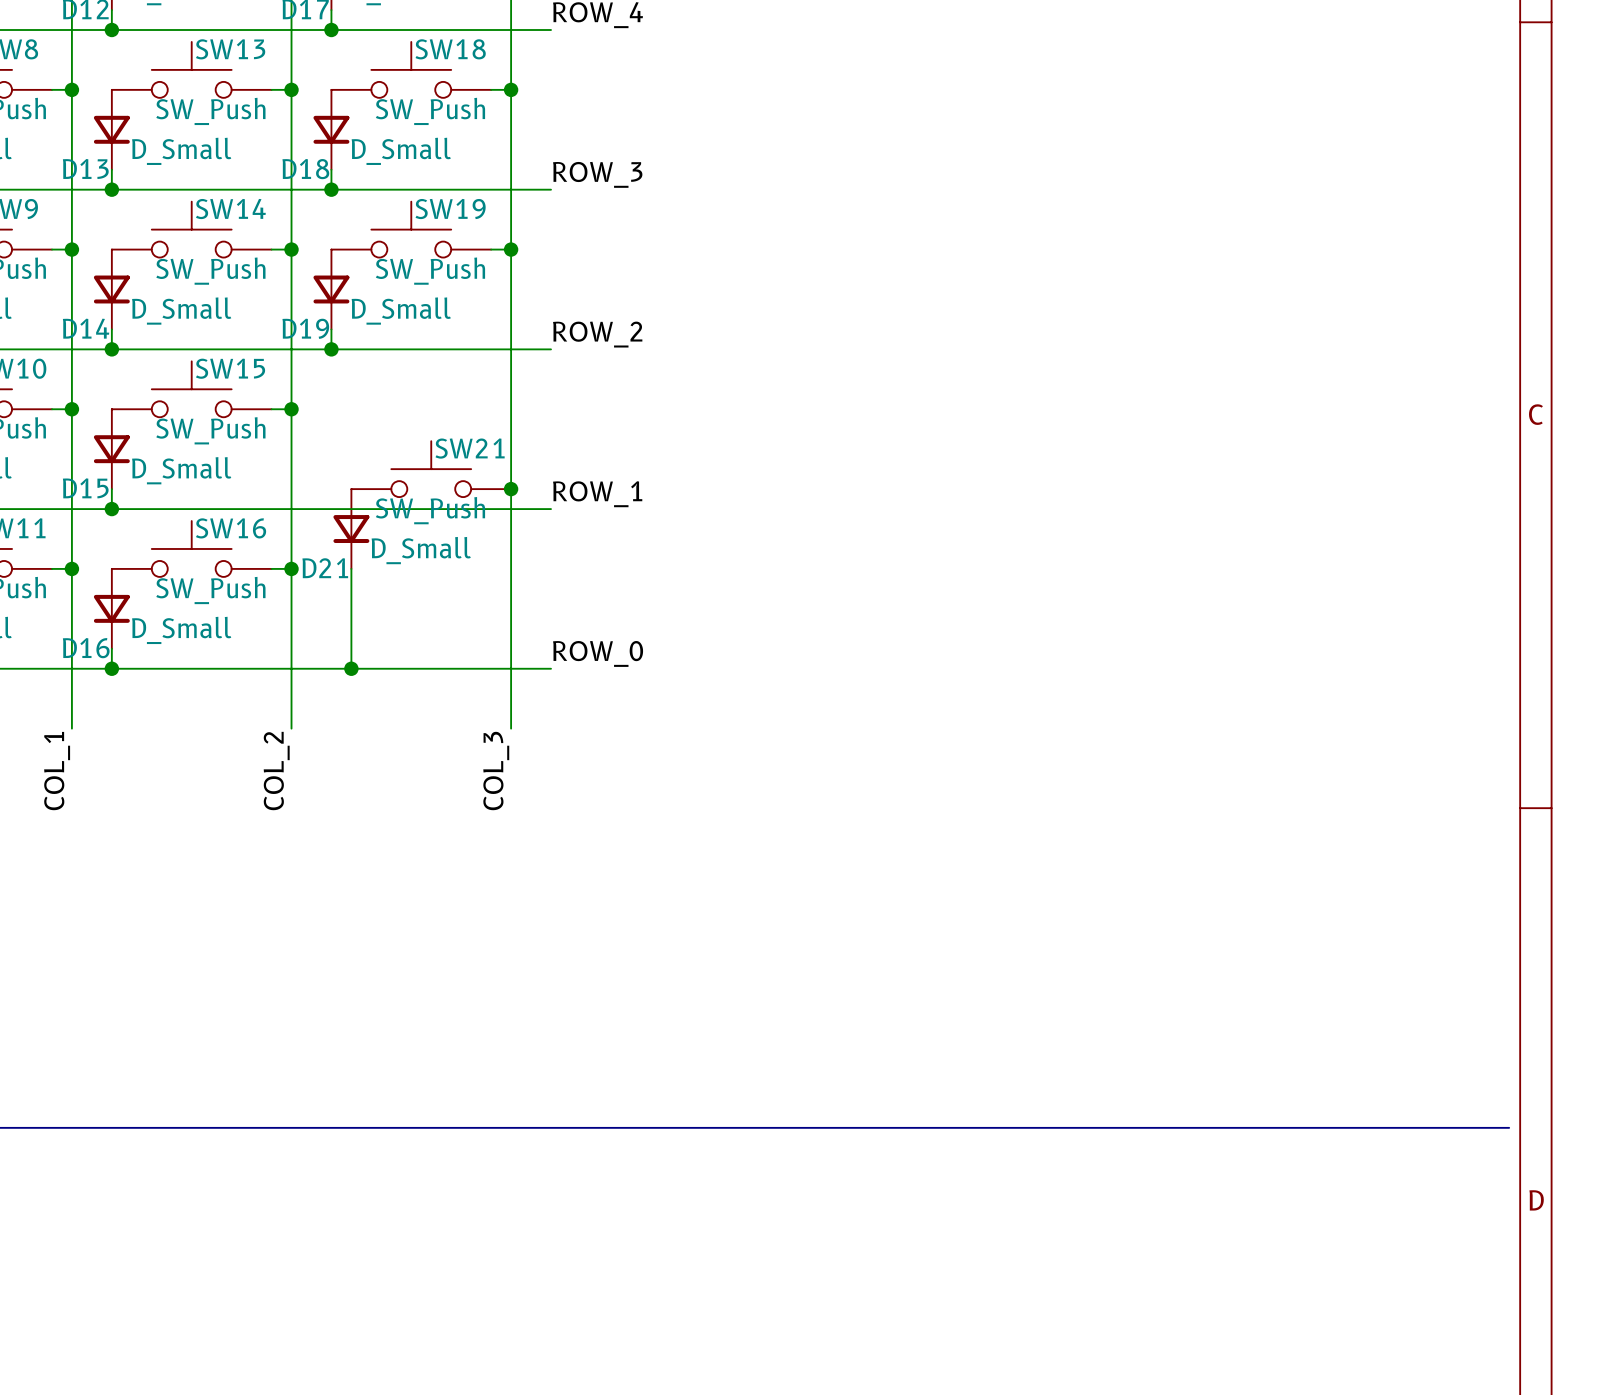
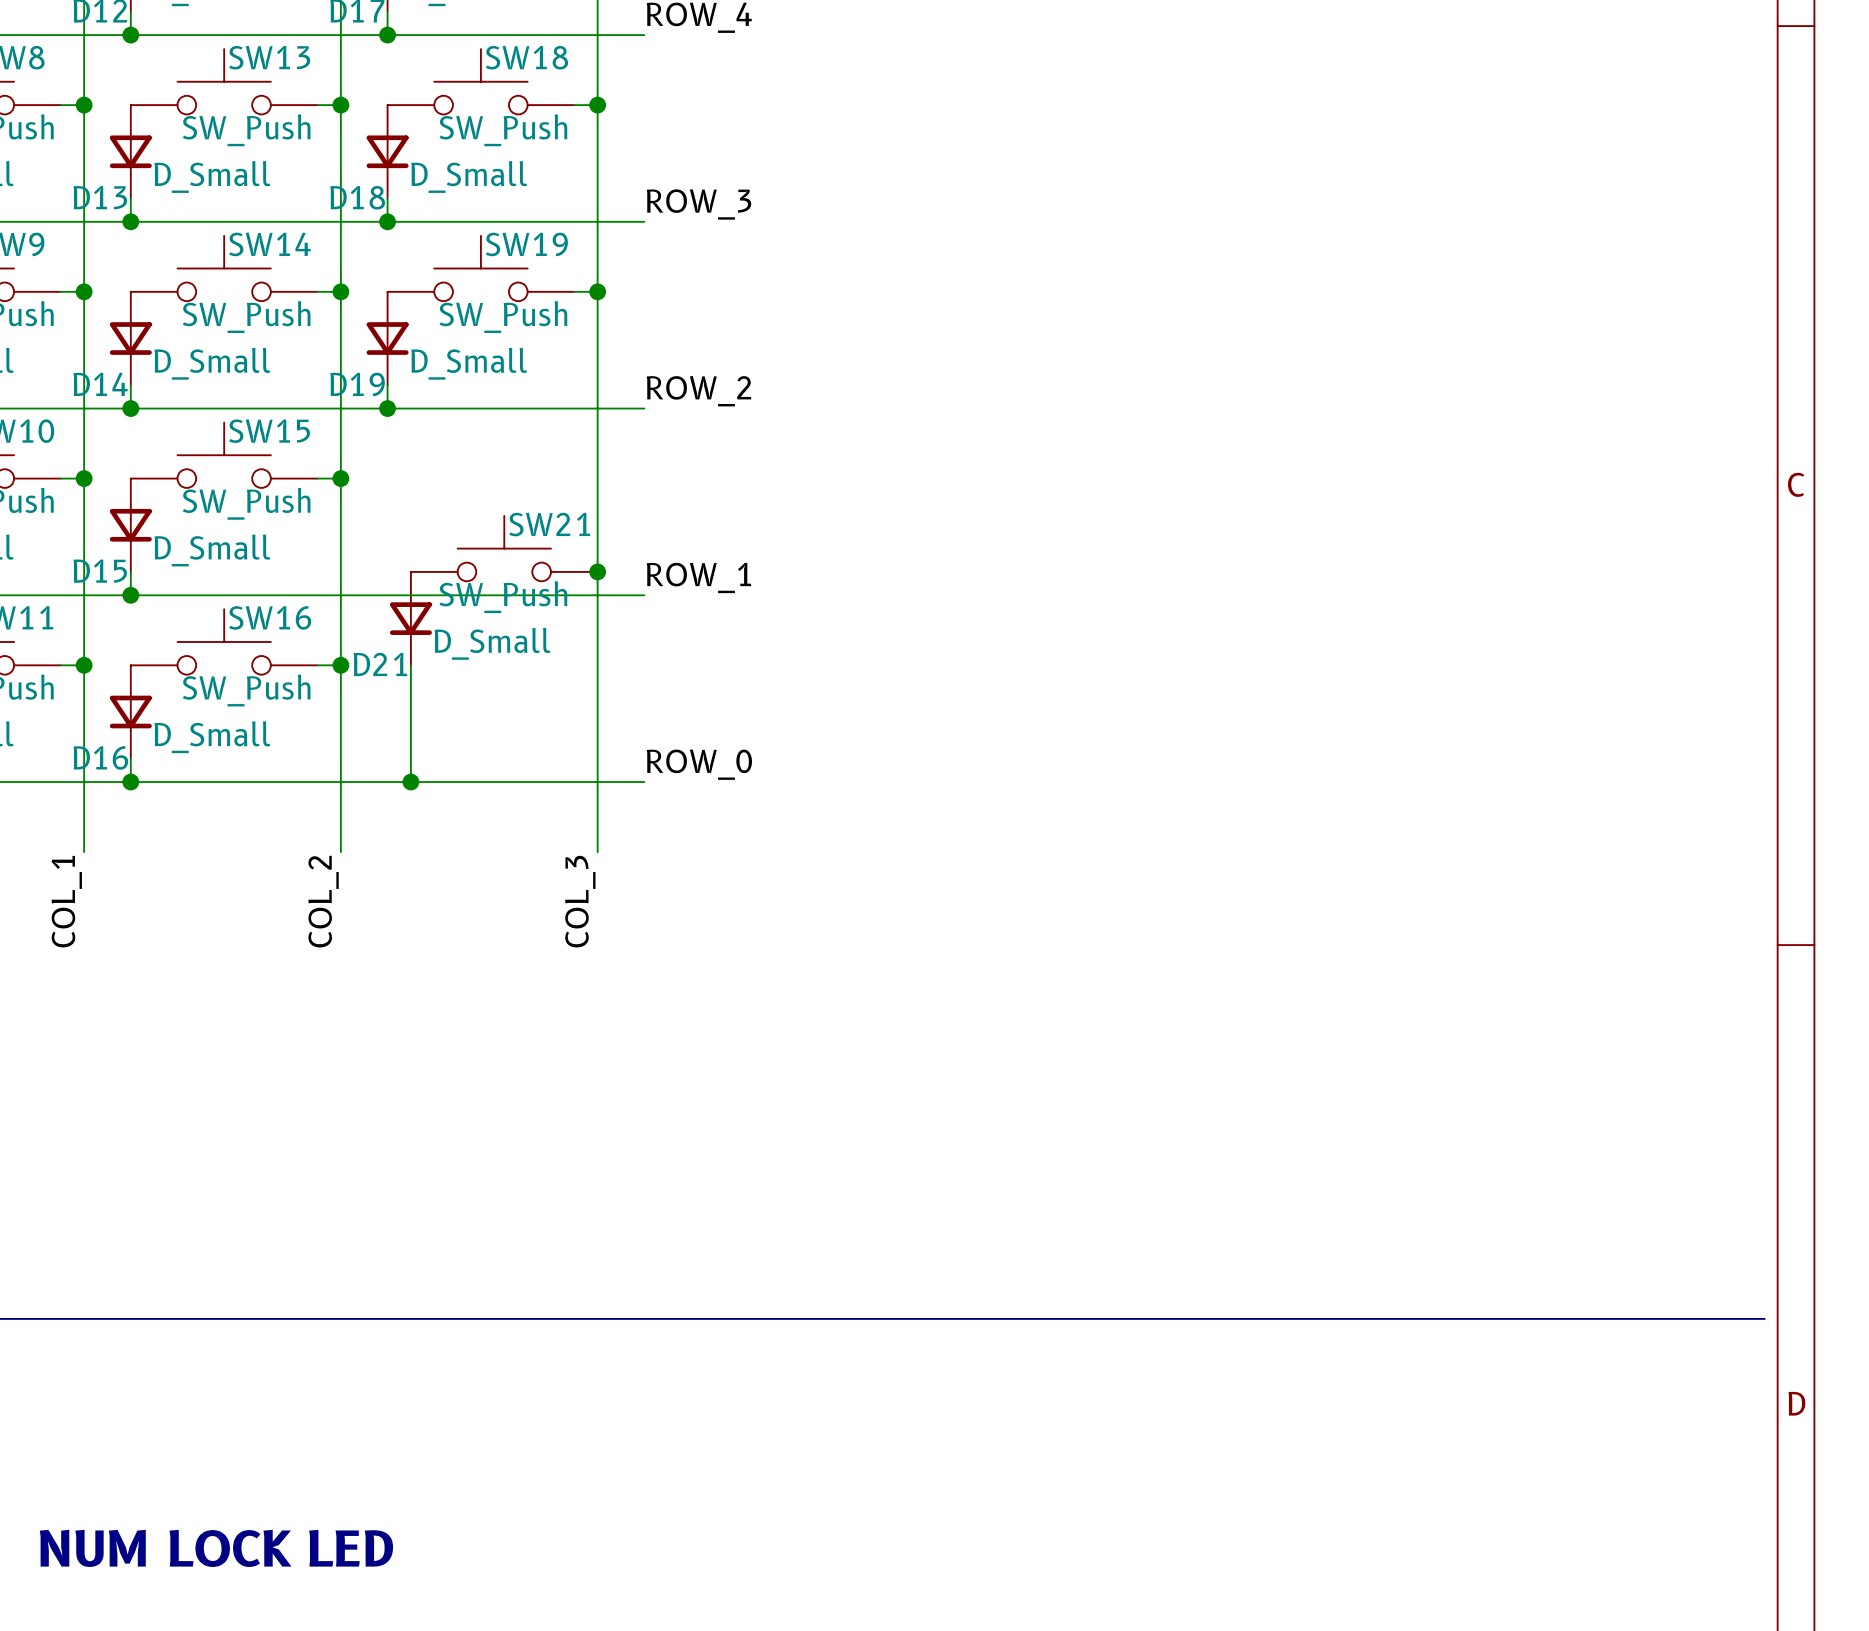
text: none -> NUM LOCK LED (216, 1548)

